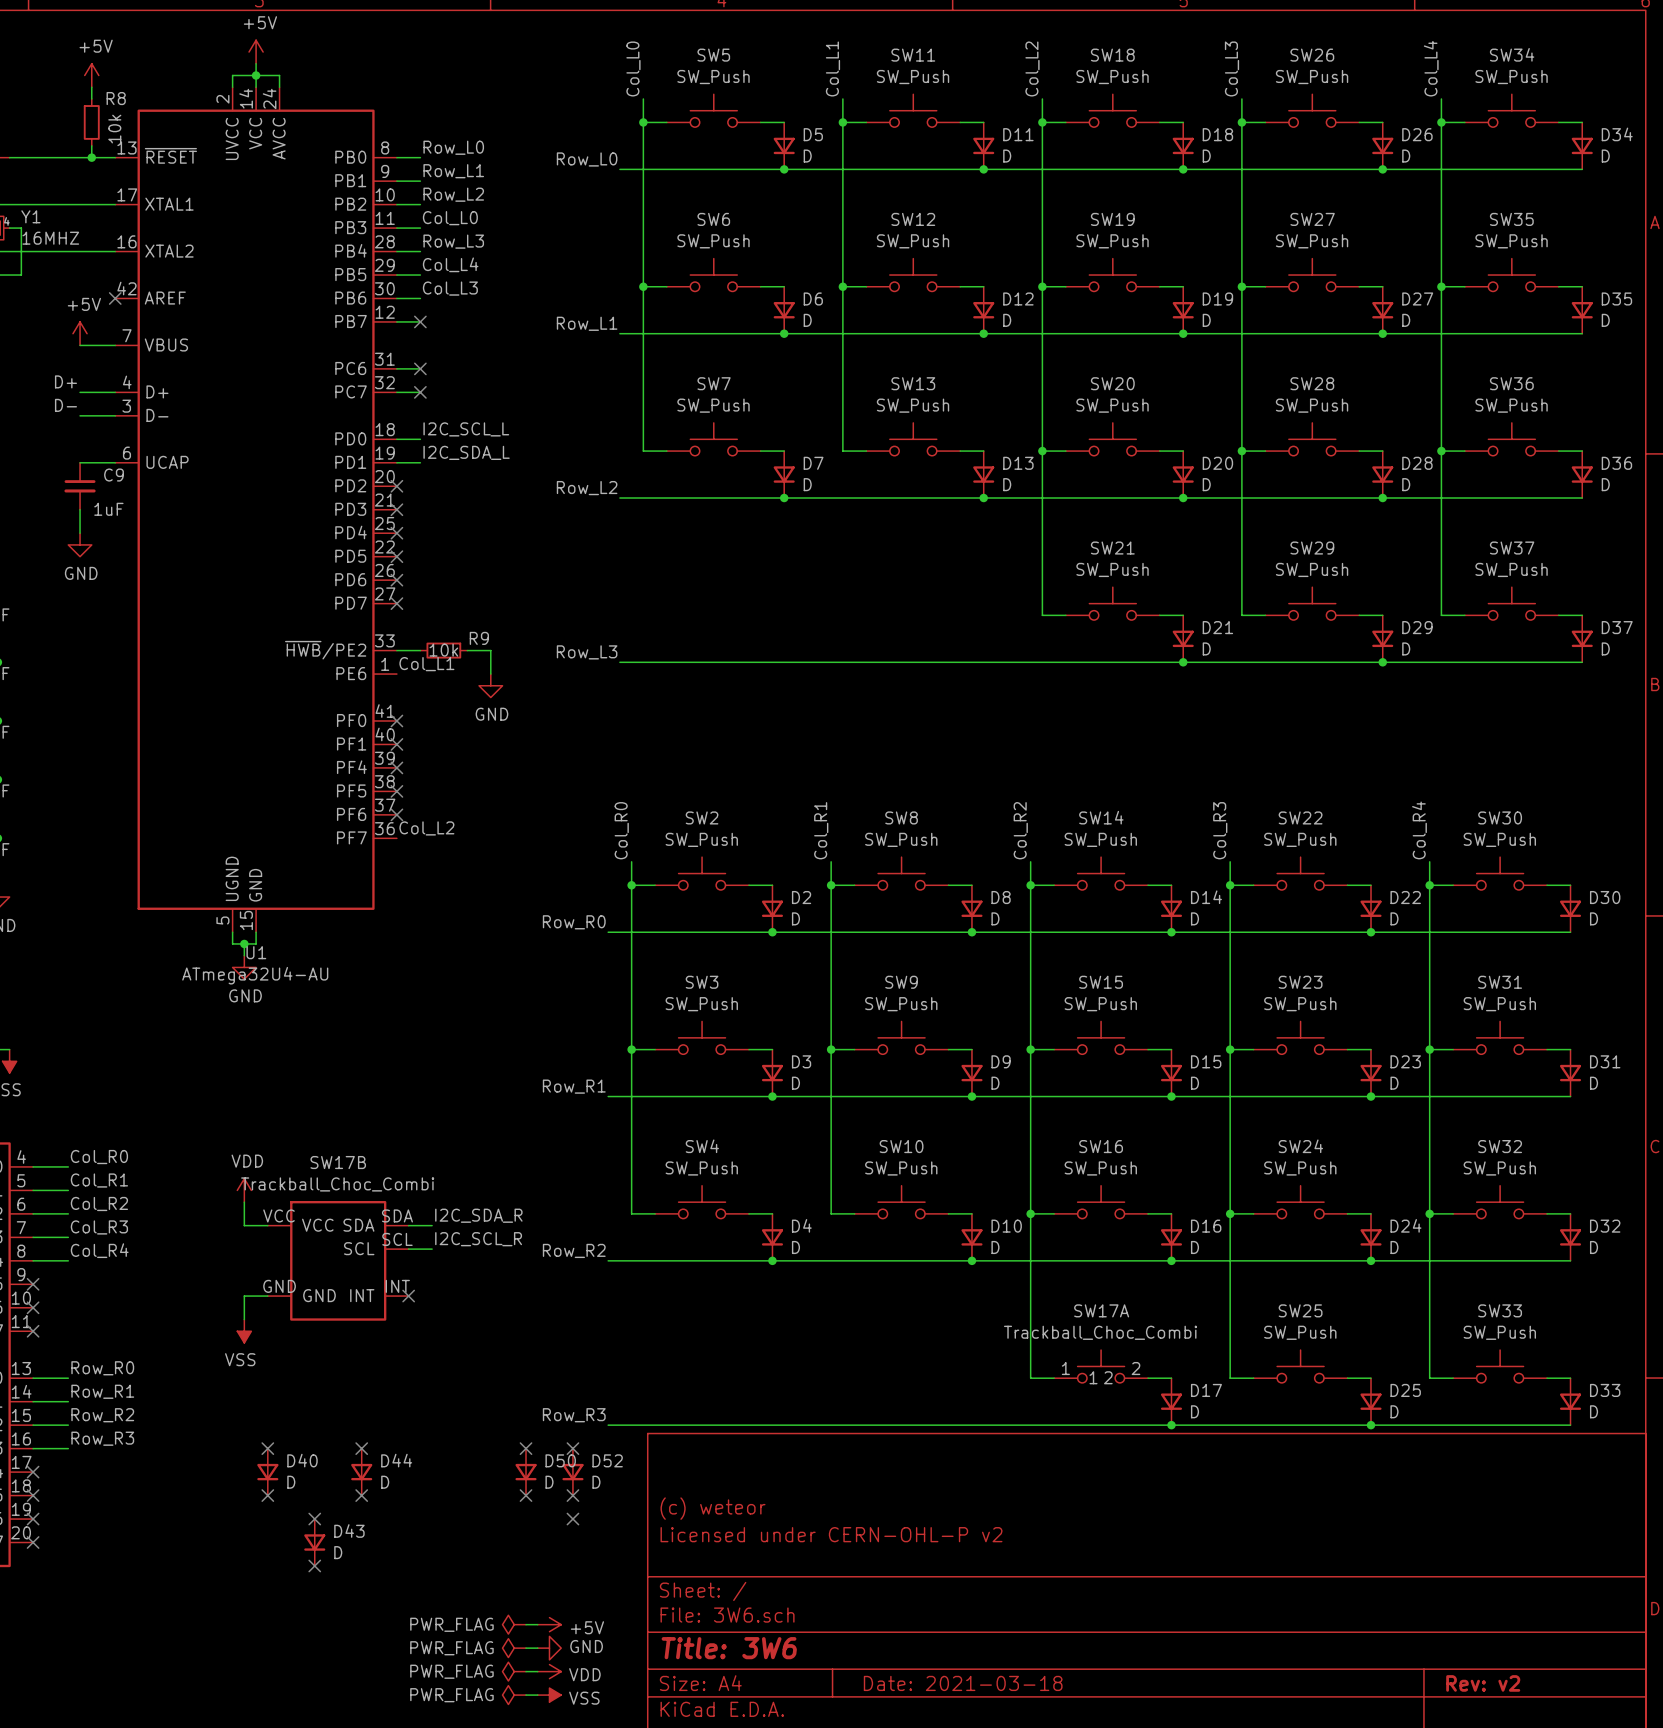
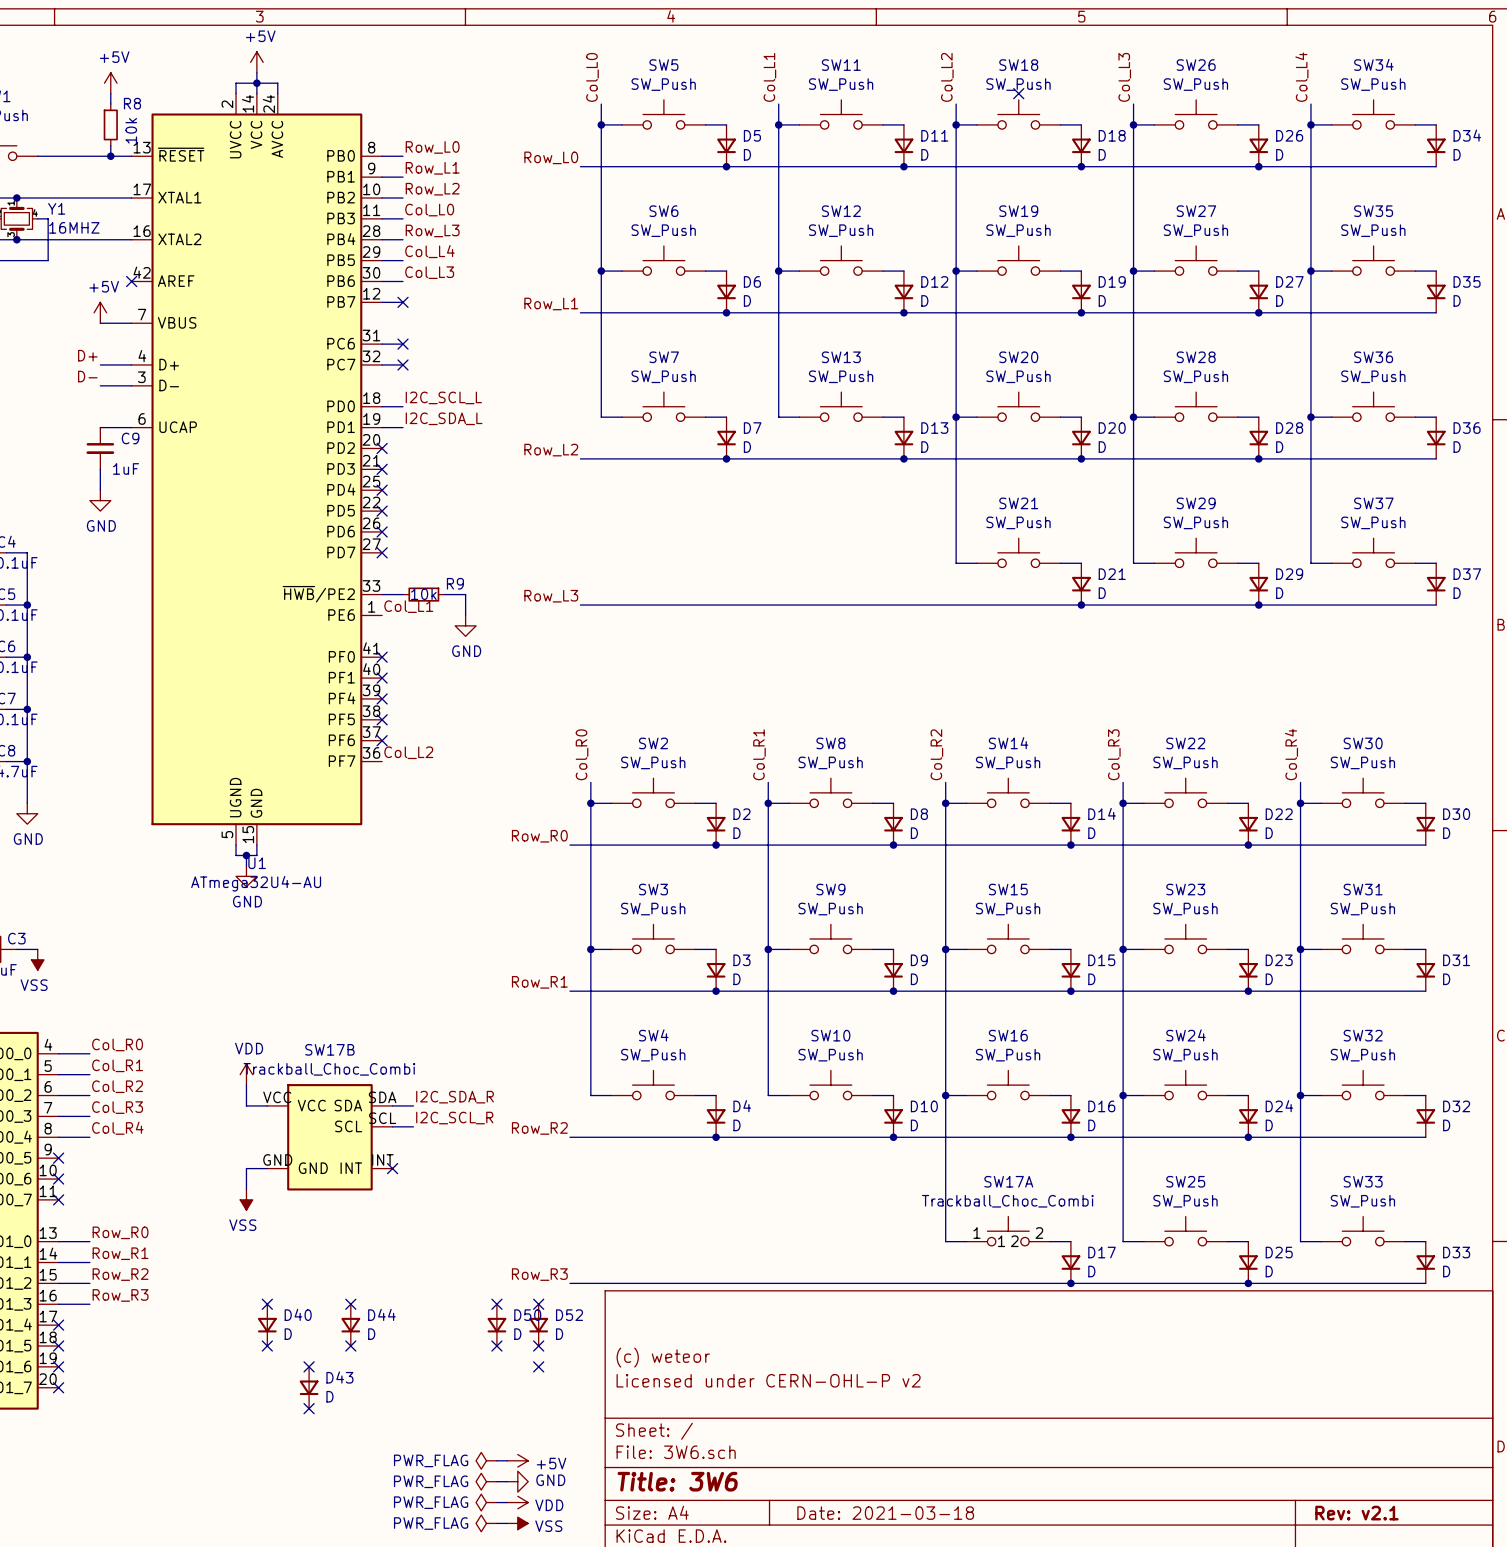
no-connect mark: none -> (1018, 93)
title block: Rev: v2 (1483, 1683) -> Rev: v2.1 (1356, 1513)

